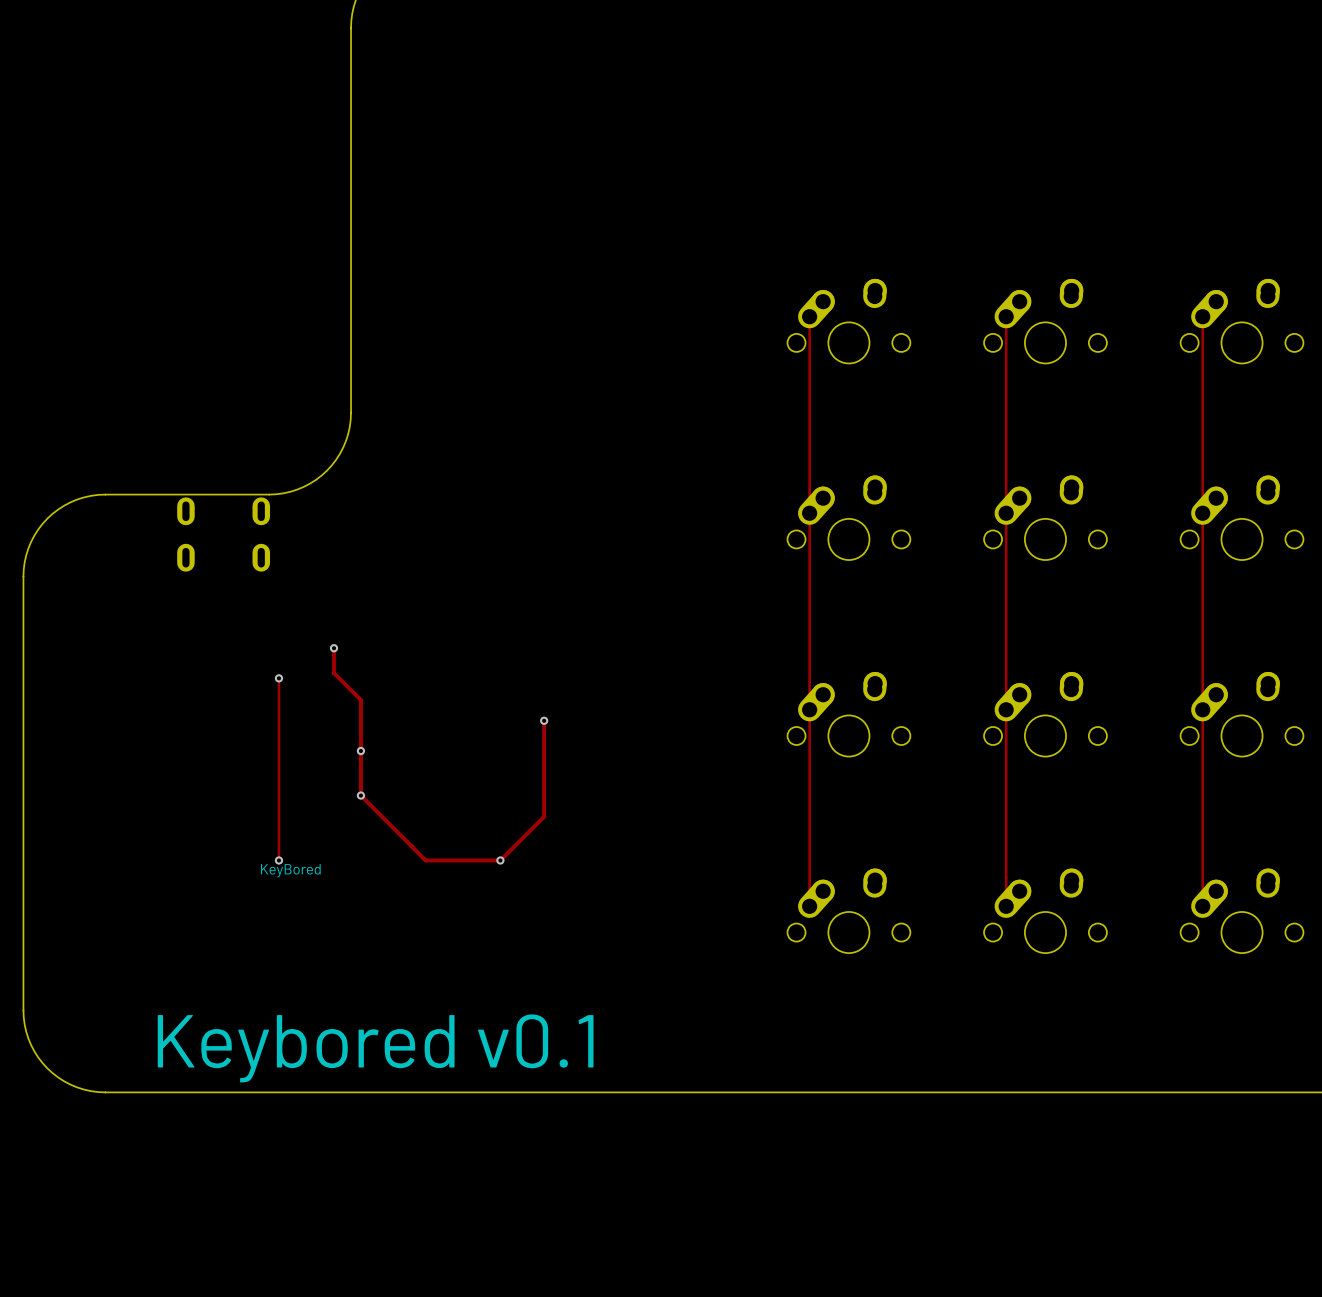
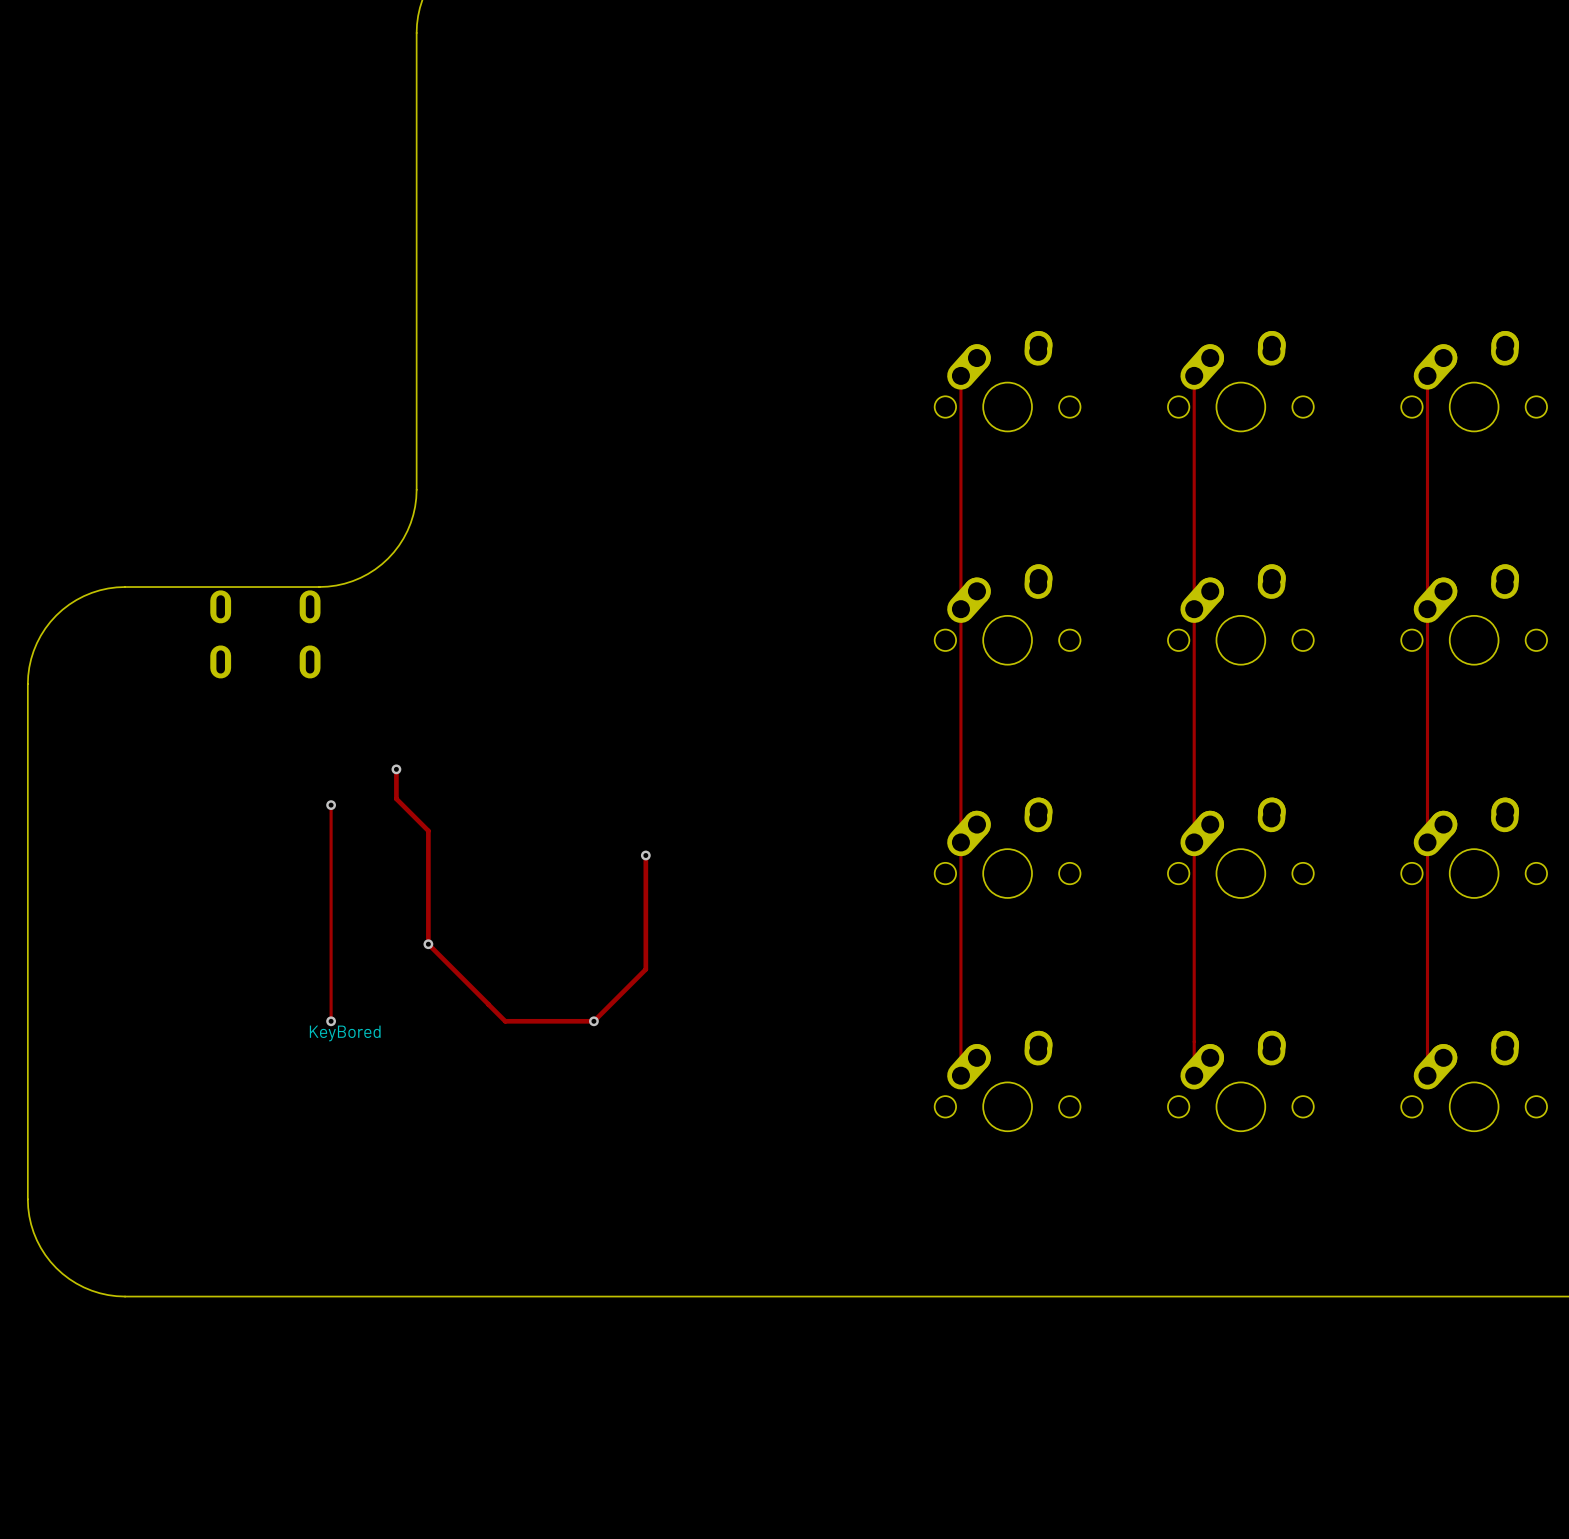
via: (360, 751) -> none
text: Keybored v0.1 (375, 1048) -> none

